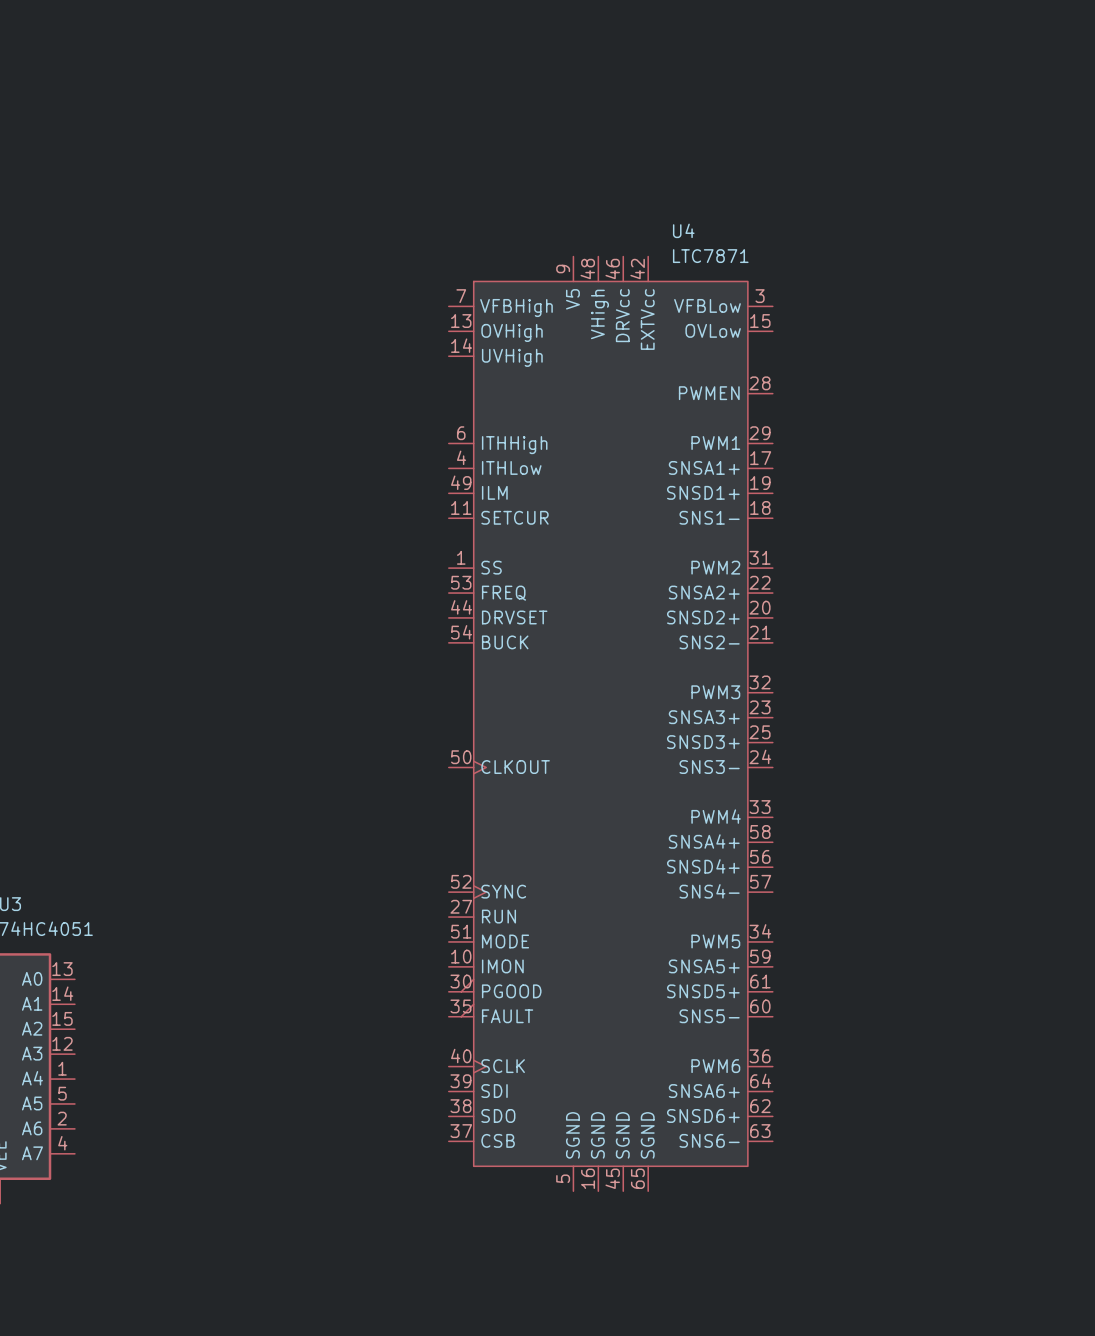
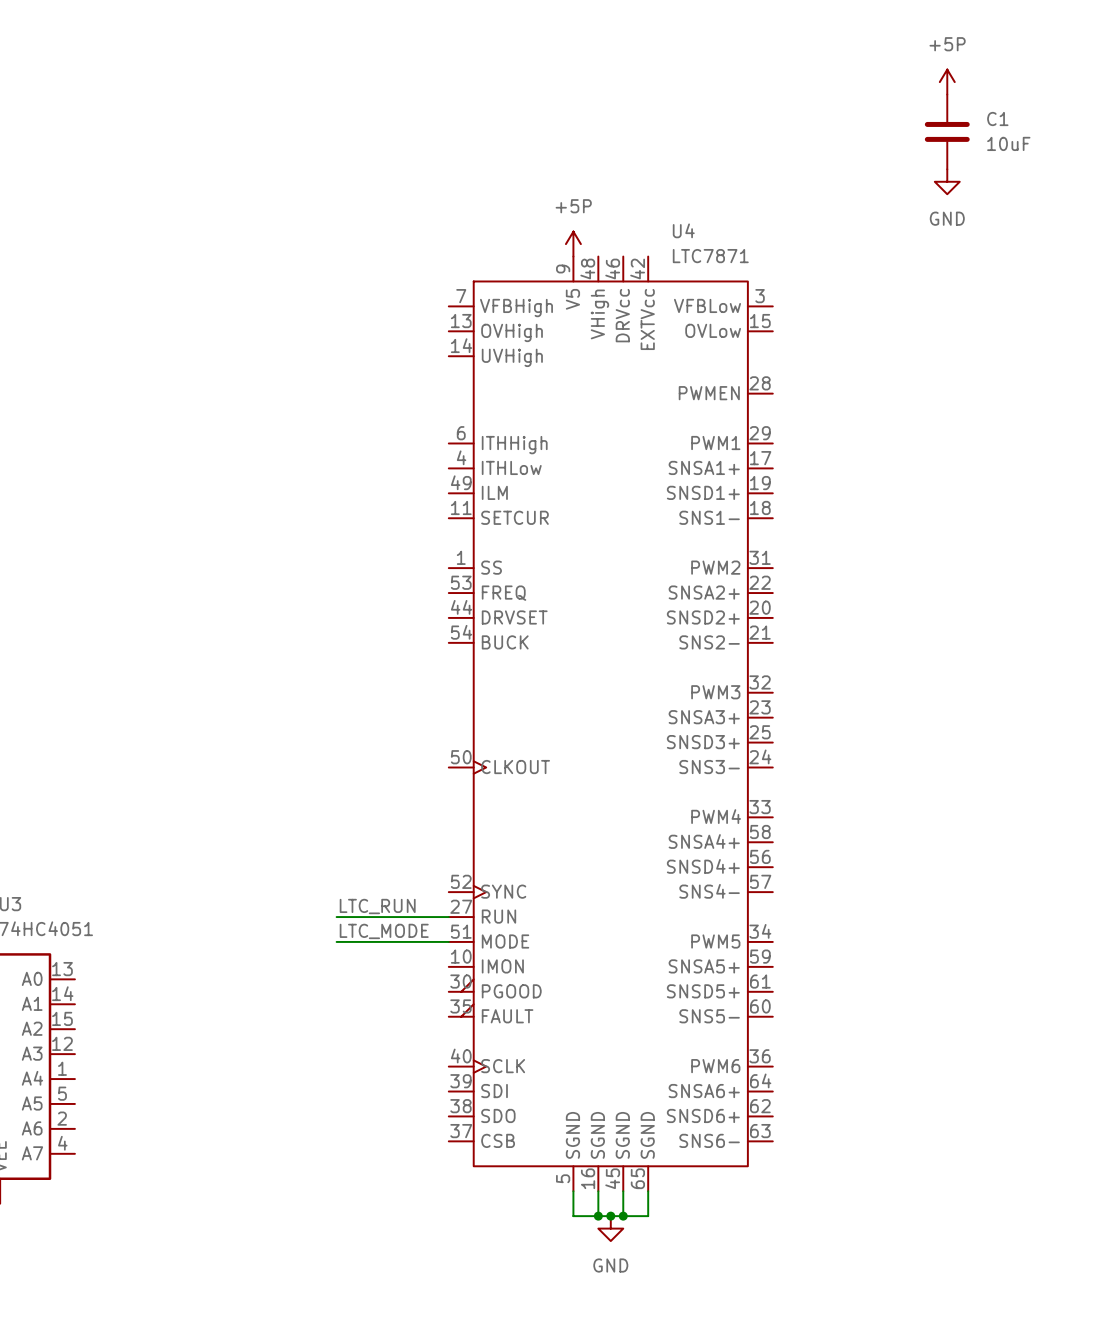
power symbol: none -> +5P (947, 82)
C1: none -> 10uF (947, 131)
power symbol: none -> GND (947, 181)
power symbol: none -> +5P (573, 244)
label: none -> LTC_RUN (377, 906)
wire: none -> (336, 917) (448, 917)
label: none -> LTC_MODE (384, 931)
wire: none -> (336, 941) (448, 941)
wire: none -> (573, 1191) (573, 1216) (648, 1216) (648, 1191)
wire: none -> (598, 1191) (598, 1216)
wire: none -> (623, 1191) (623, 1216)
junction: none -> (598, 1216)
junction: none -> (610, 1216)
junction: none -> (623, 1216)
power symbol: none -> GND (610, 1228)

